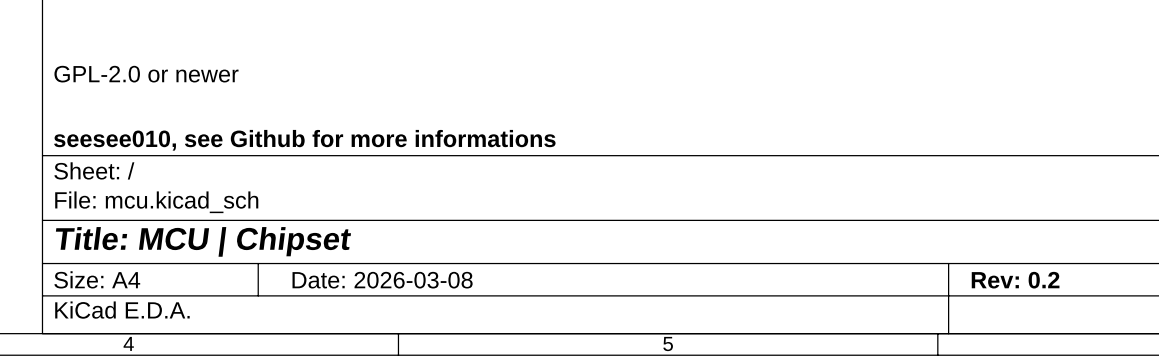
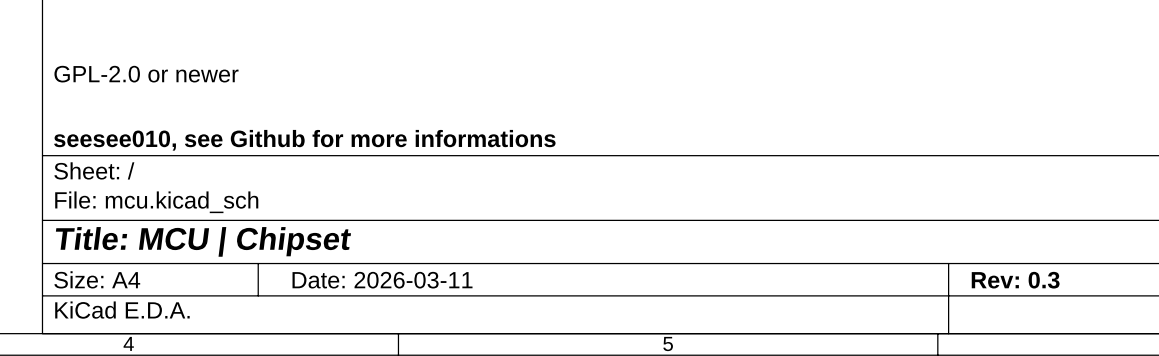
title block: Date: 2026-03-08 (382, 280) -> Date: 2026-03-11 (382, 280)
title block: Rev: 0.2 (1015, 280) -> Rev: 0.3 (1015, 280)

